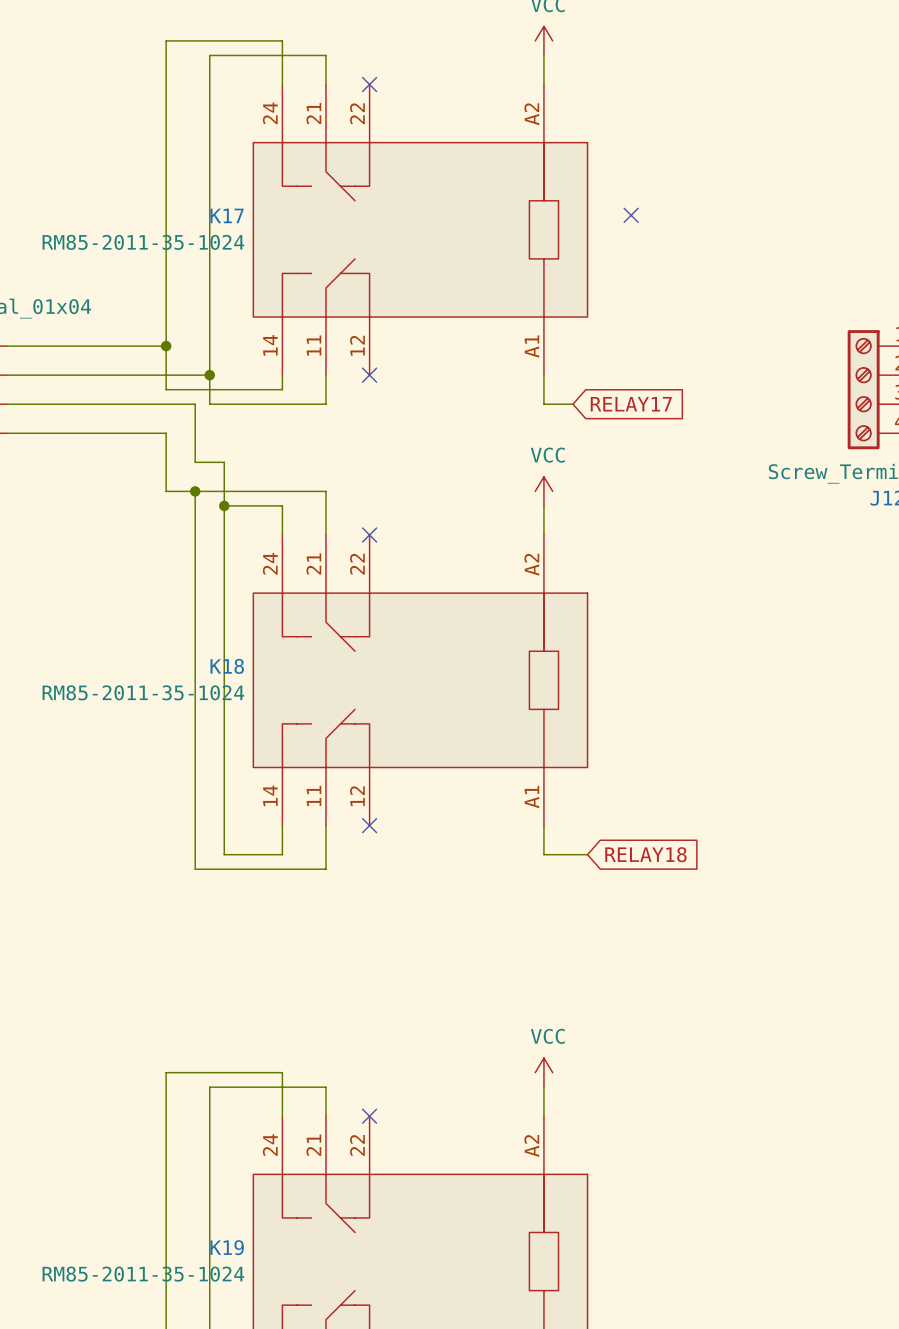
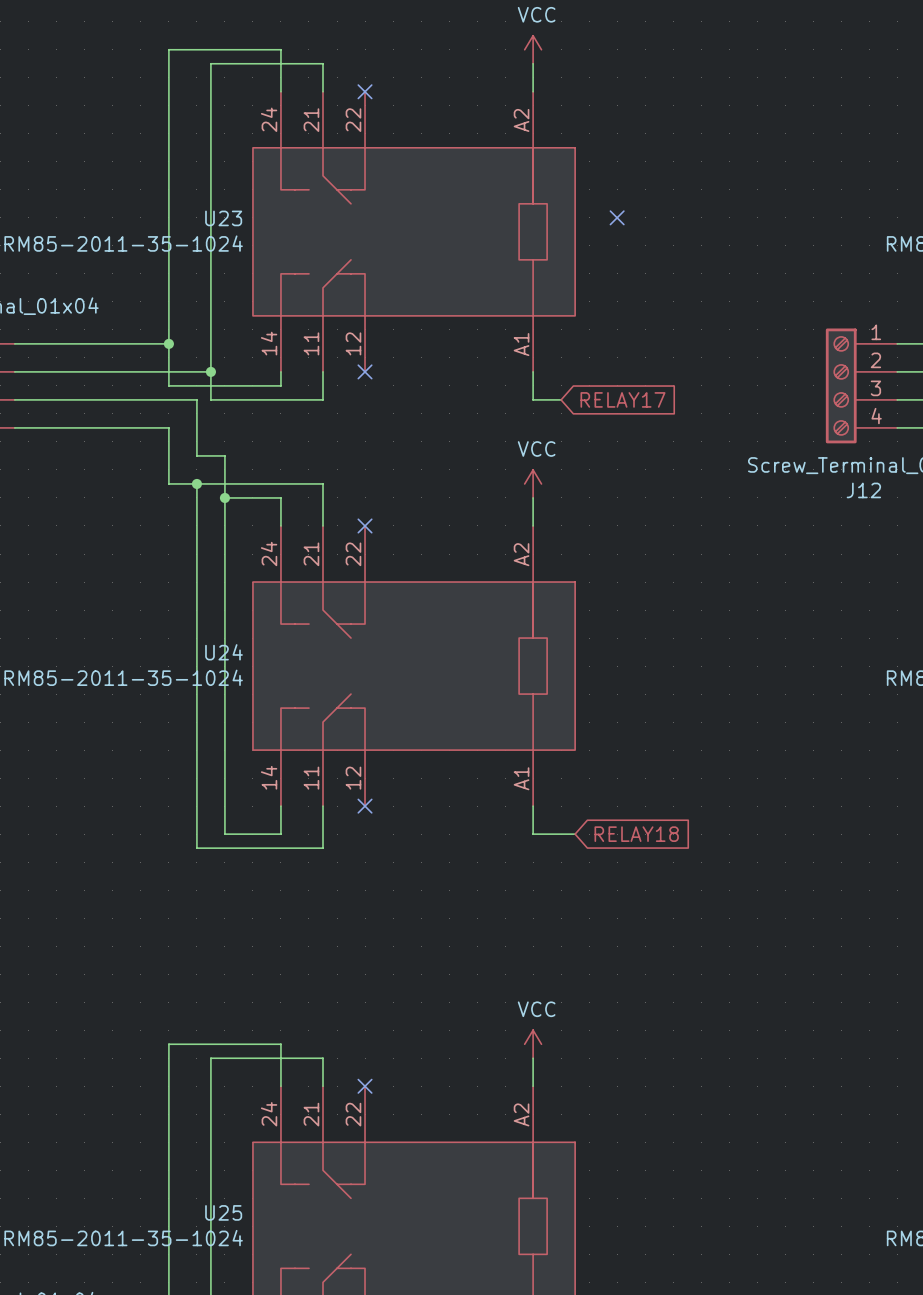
K17 name: K17 (227, 215) -> U23 (223, 218)
K18 name: K18 (227, 666) -> U24 (224, 652)
K19 name: K19 (227, 1247) -> U25 (223, 1212)

